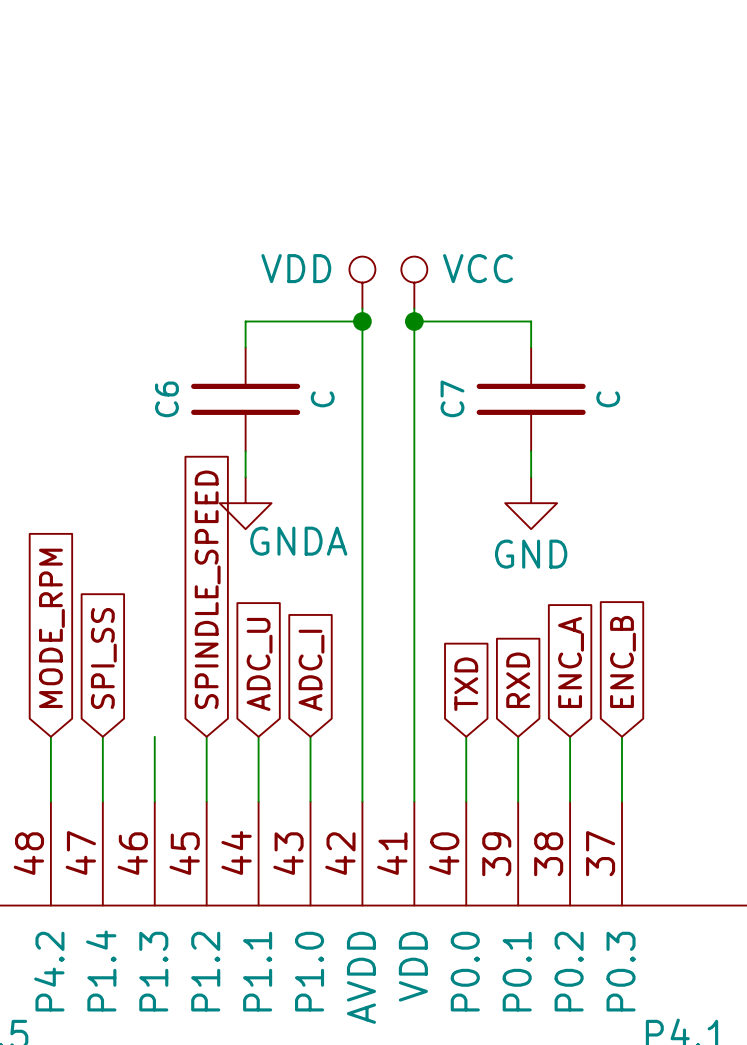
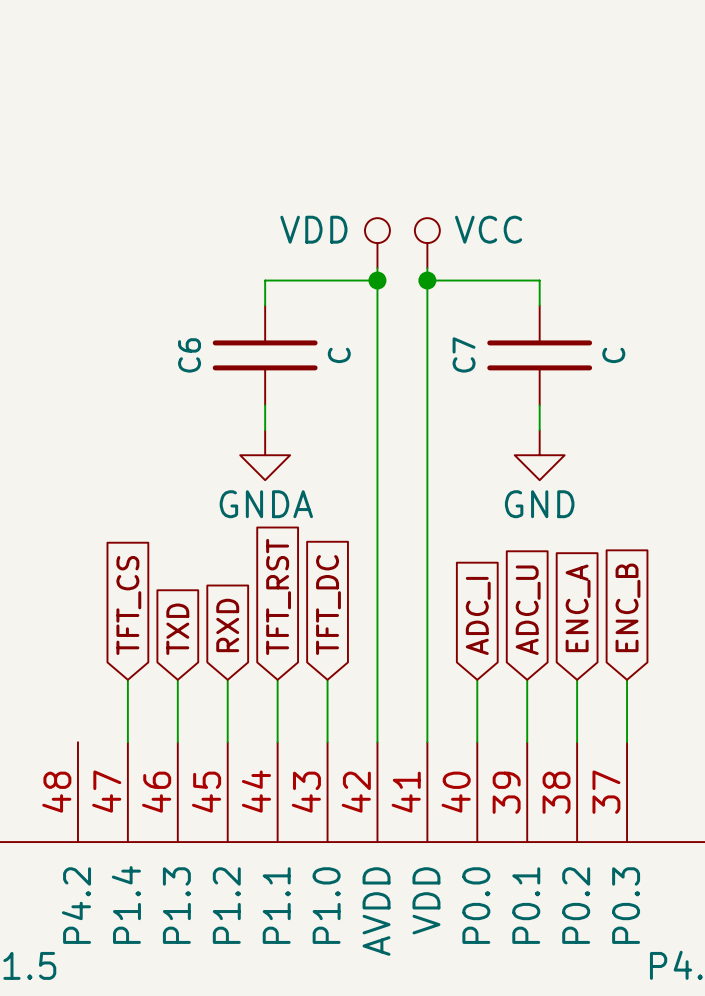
power symbol text position: GNDA (298, 541) -> GNDA (266, 504)
global label: SPINDLE_SPEED (207, 589) -> RXD (227, 625)
global label: MODE_RPM (51, 628) -> none
global label: SPI_SS (103, 658) -> TFT_CS (128, 605)
global label: ADC_U (259, 664) -> TFT_RST (278, 596)
global label: ADC_I (311, 670) -> TFT_DC (328, 605)
global label: RXD (518, 680) -> ADC_U (528, 610)
global label: none -> TXD (177, 629)
global label: TXD (466, 684) -> ADC_I (478, 615)
wire: (50, 736) (50, 801) -> none

